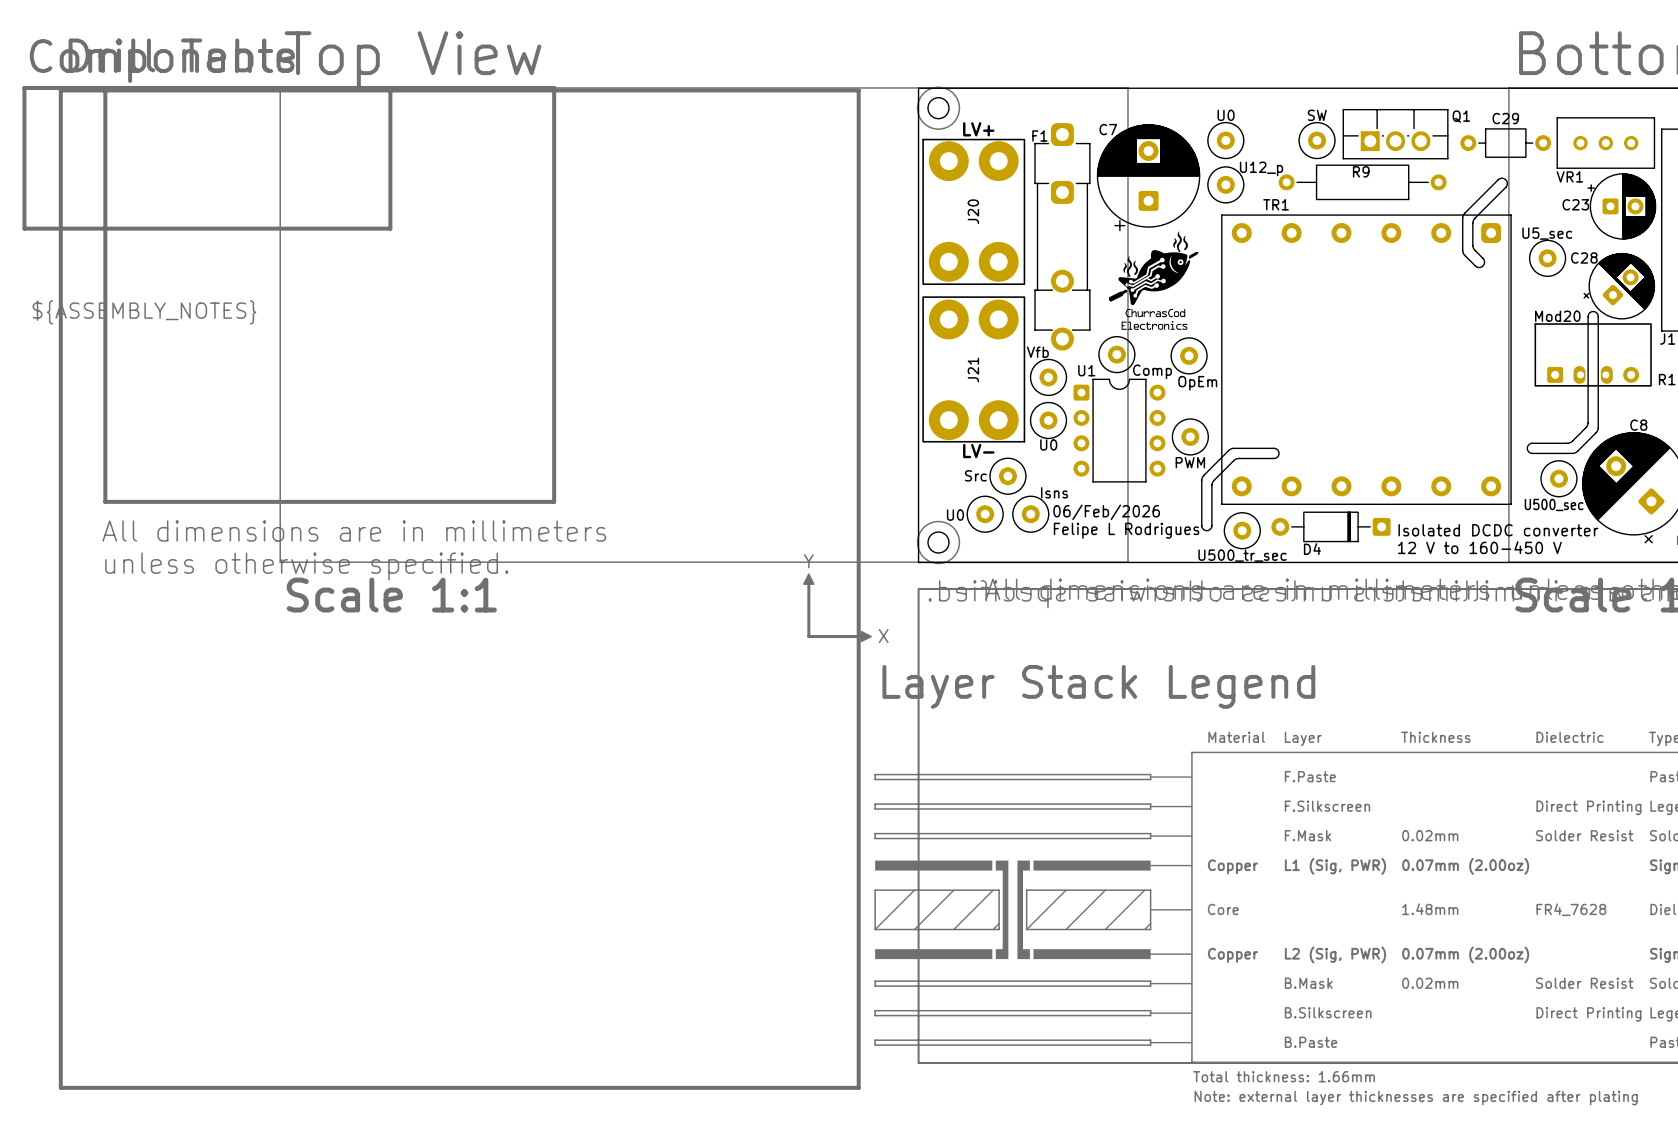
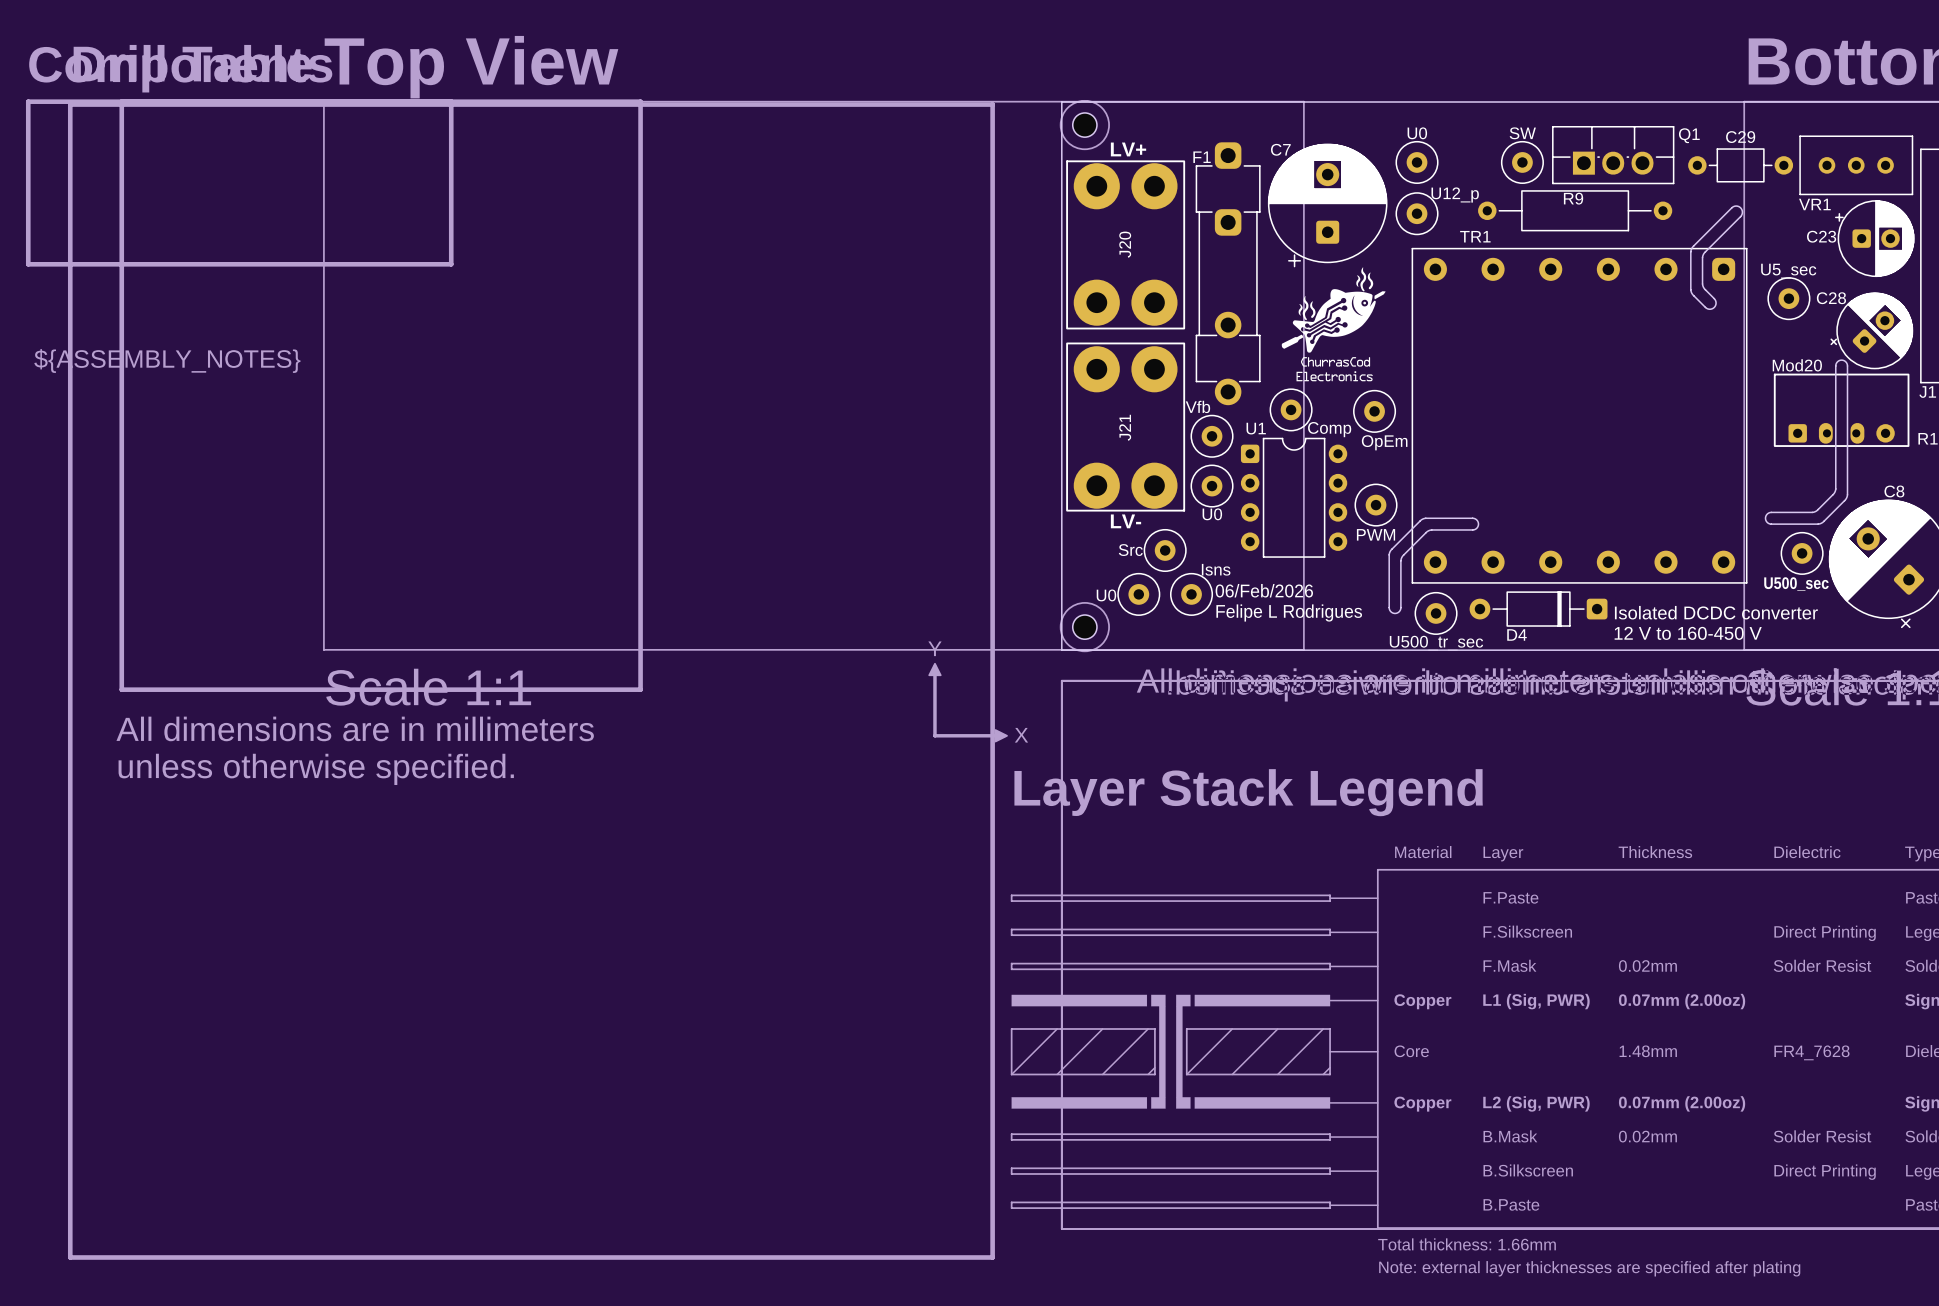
line: (105, 501) (554, 501) -> (121, 580) (121, 689) (640, 689) (640, 580)
text position: All dimensions are in millimeters (354, 531) -> All dimensions are in millimeters (355, 728)
text position: unless otherwise specified. (306, 566) -> unless otherwise specified. (316, 769)

